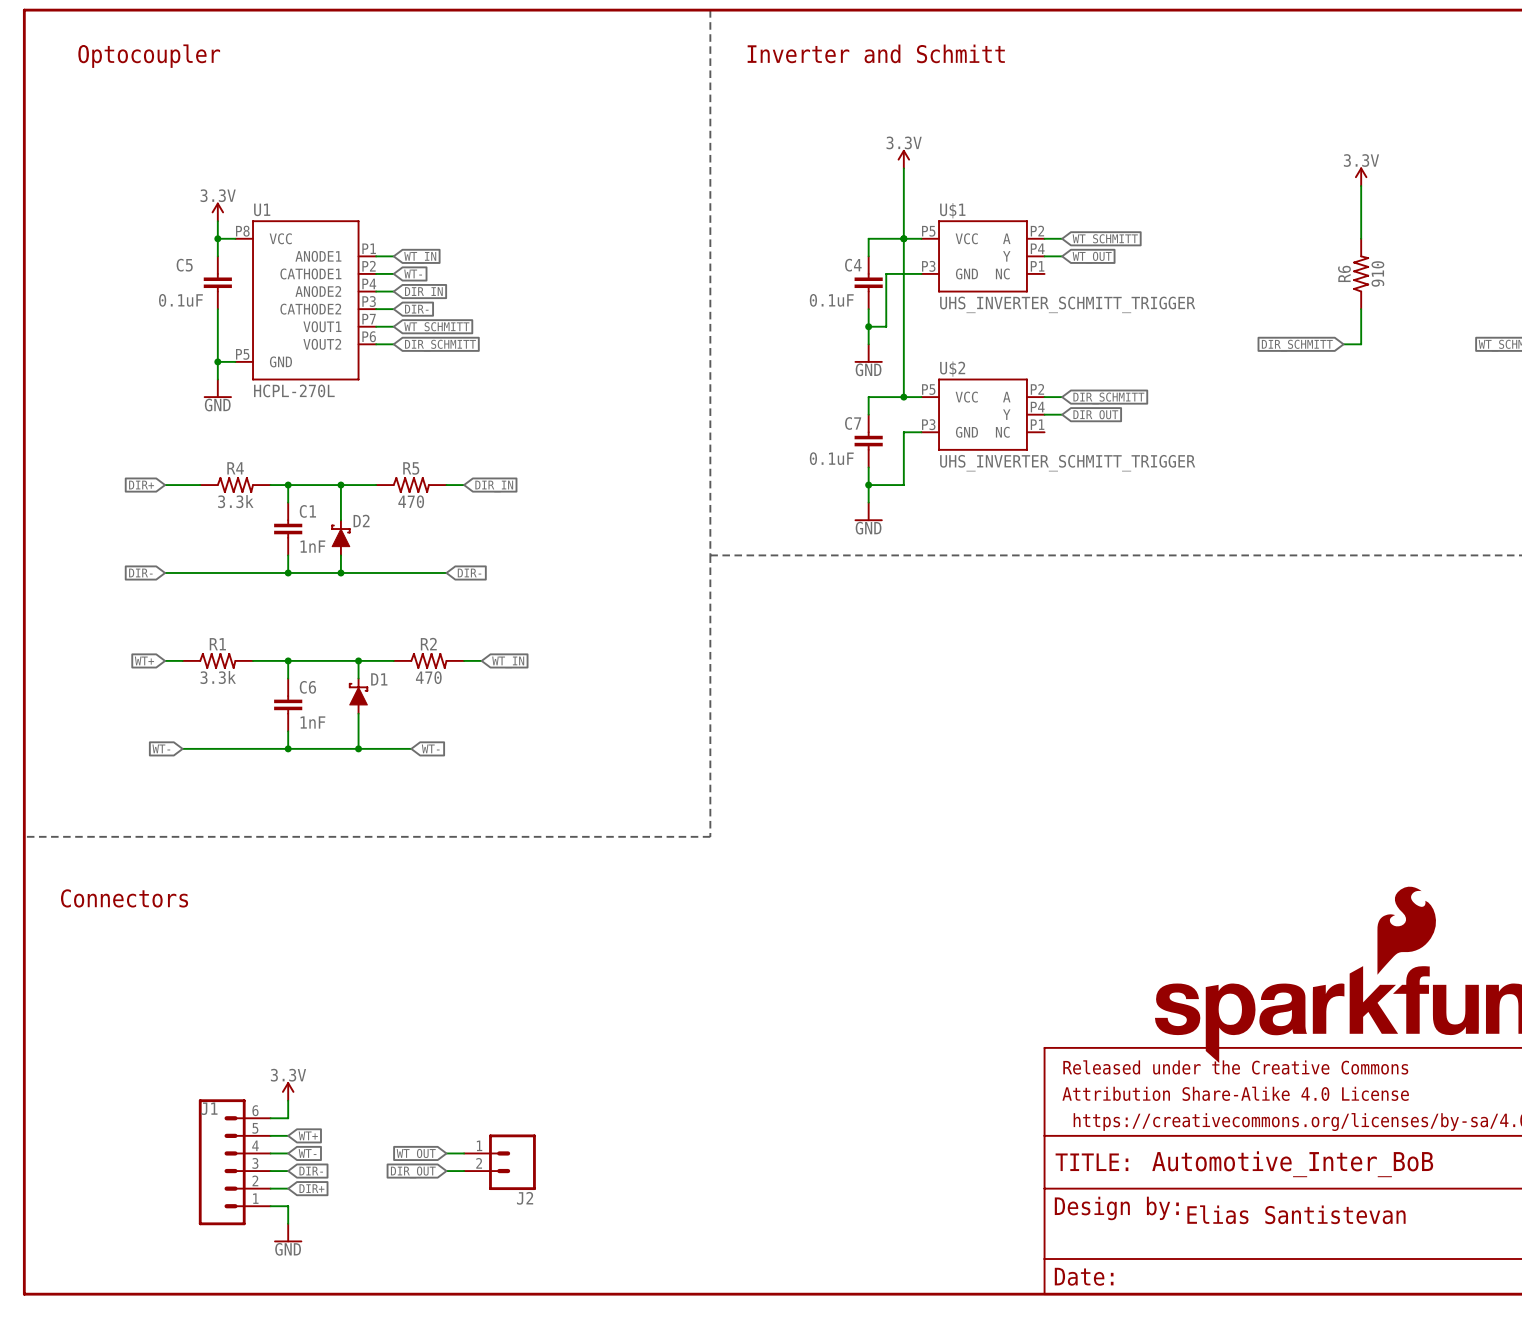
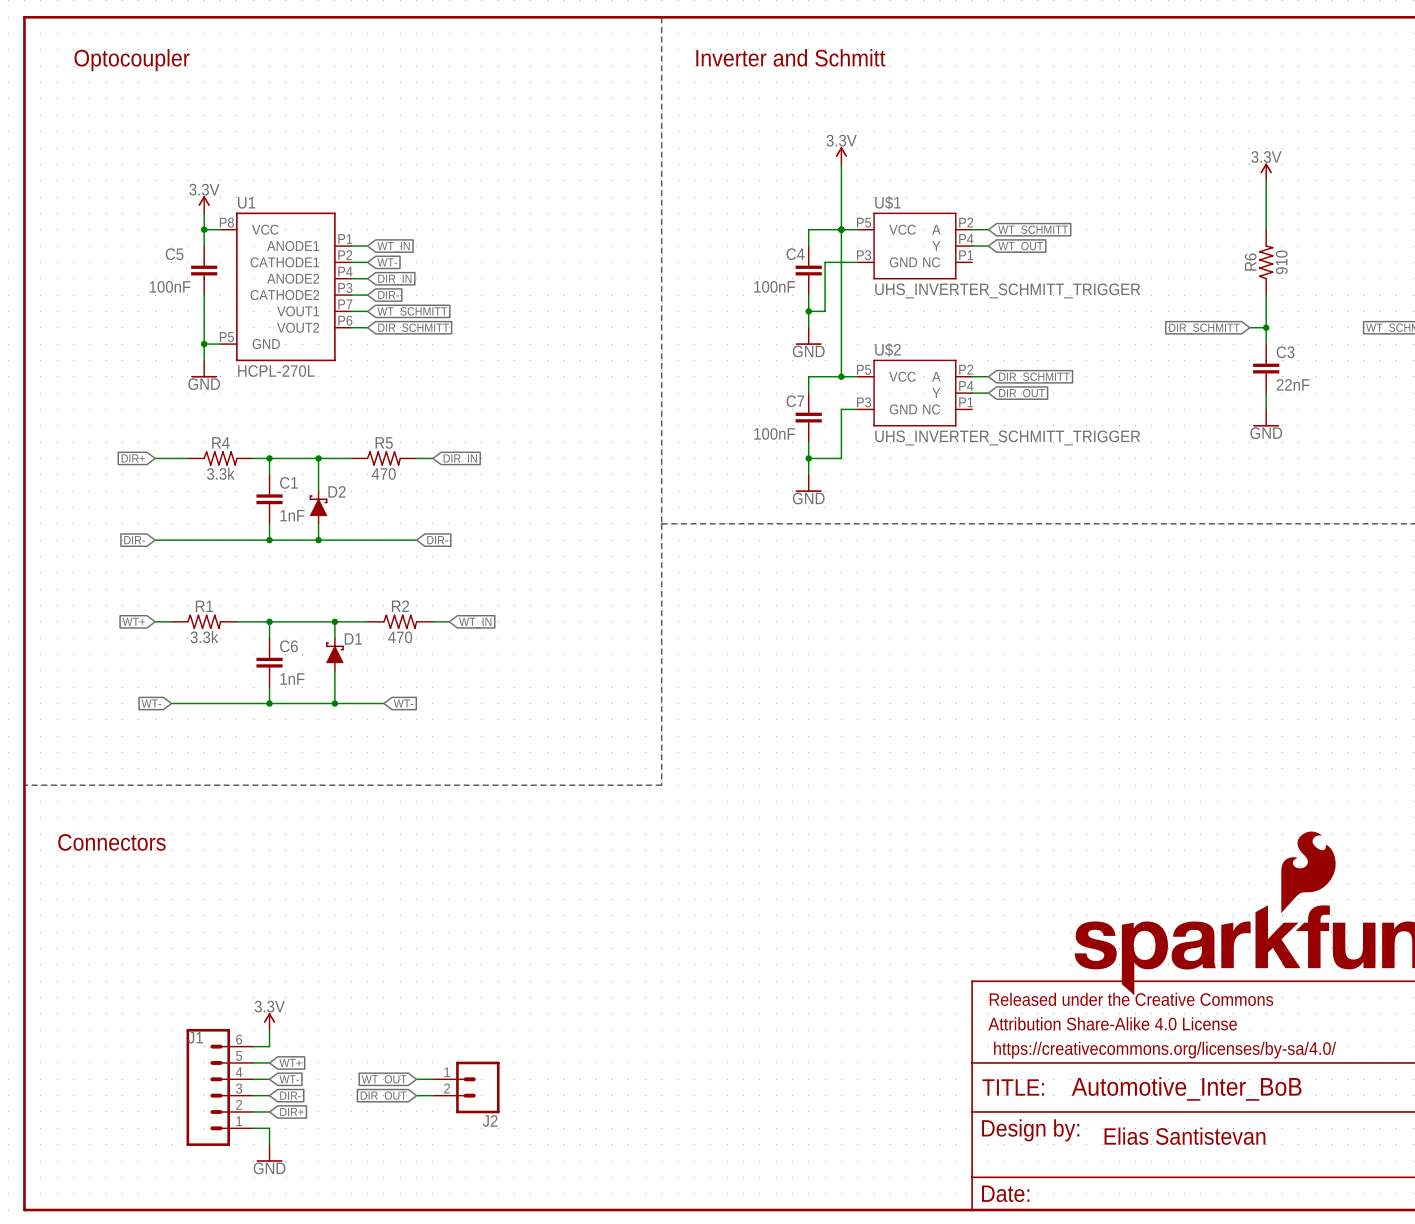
C5 value: 0.1uF (180, 300) -> 100nF (170, 286)
C4 value: 0.1uF (831, 300) -> 100nF (774, 286)
wire: none -> (1266, 327) (1266, 344)
junction: none -> (1266, 327)
C3: none -> 22nF (1266, 368)
wire: none -> (1266, 393) (1266, 409)
power symbol: none -> GND (1266, 418)
C7 value: 0.1uF (831, 458) -> 100nF (774, 433)

